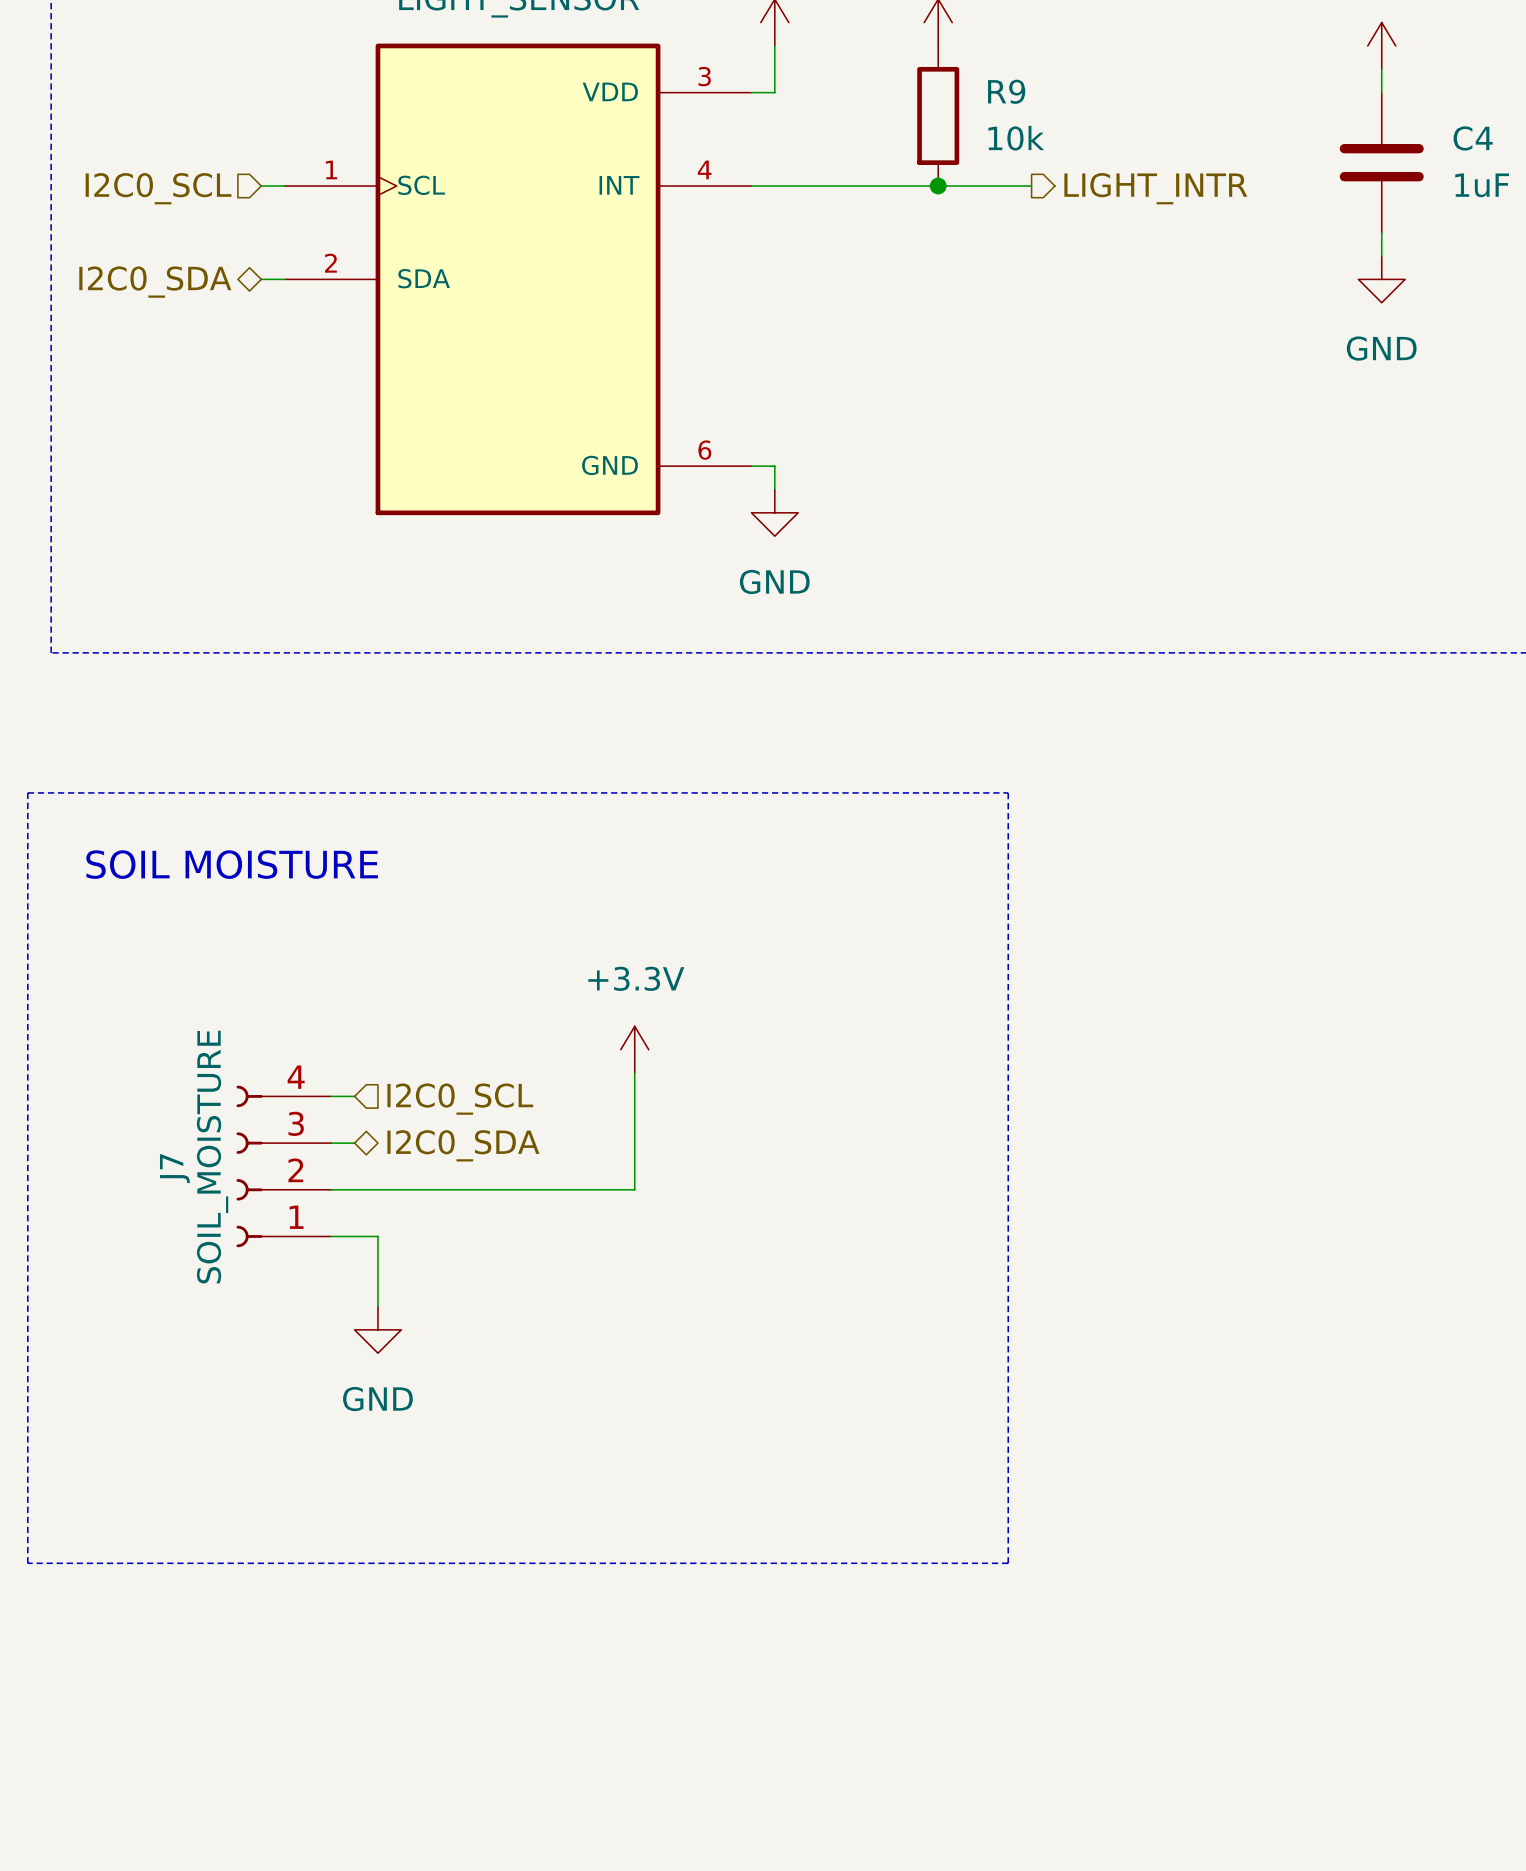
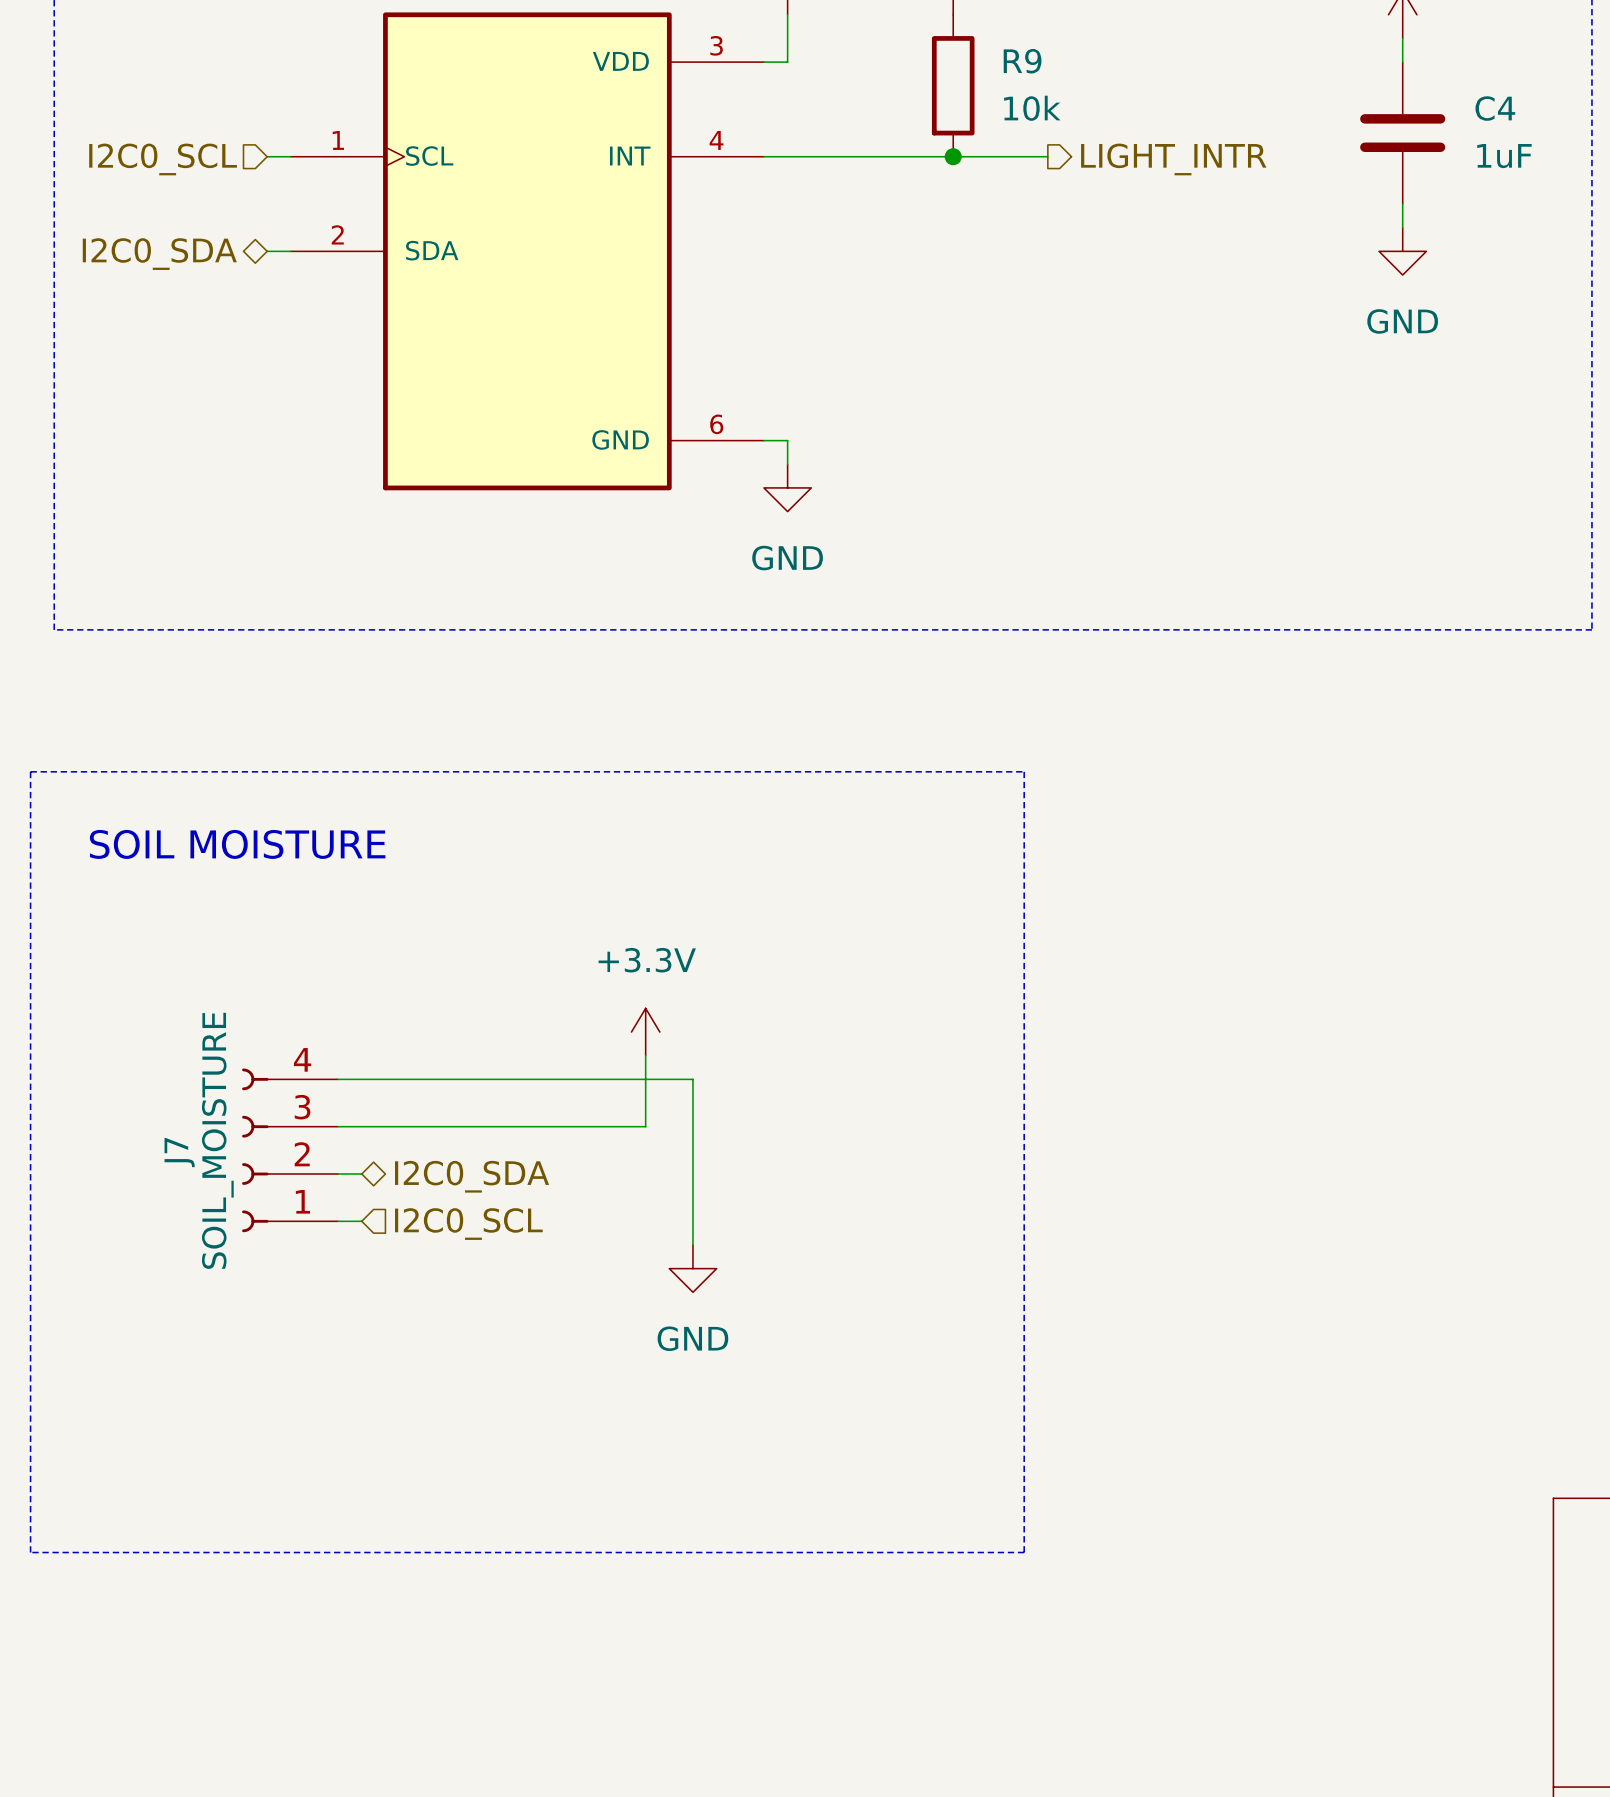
wire: none -> (361, 1079) (692, 1079) (692, 1244)
hierarchical label position: I2C0_SCL (460, 1099) -> I2C0_SCL (468, 1224)
wire: (634, 1143) (634, 1189) (354, 1189) -> (645, 1126) (361, 1126)
hierarchical label position: I2C0_SDA (463, 1145) -> I2C0_SDA (472, 1176)
wire: (354, 1236) (377, 1236) (377, 1306) -> none
power symbol position: GND (377, 1329) -> GND (692, 1268)

